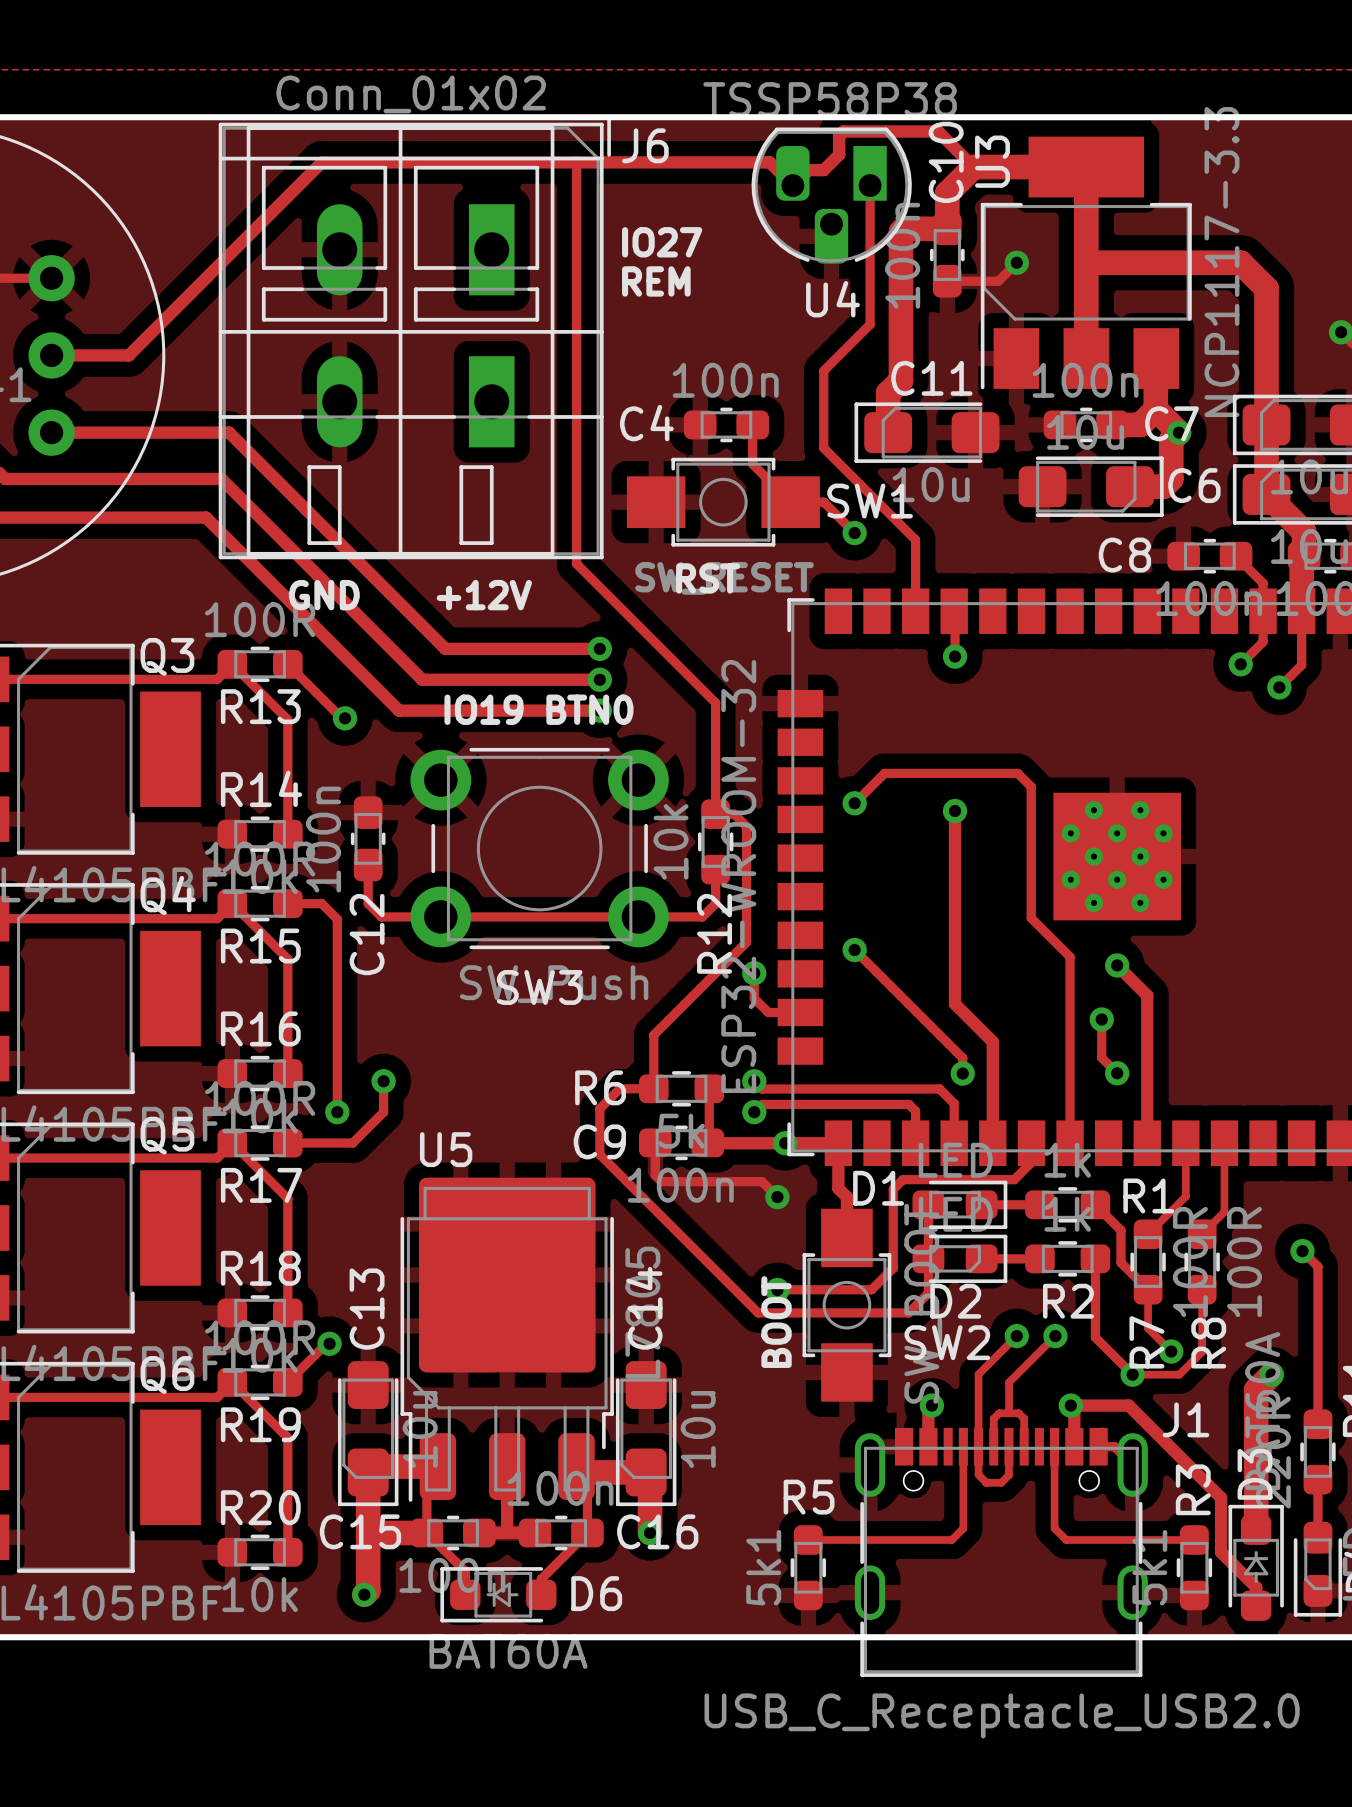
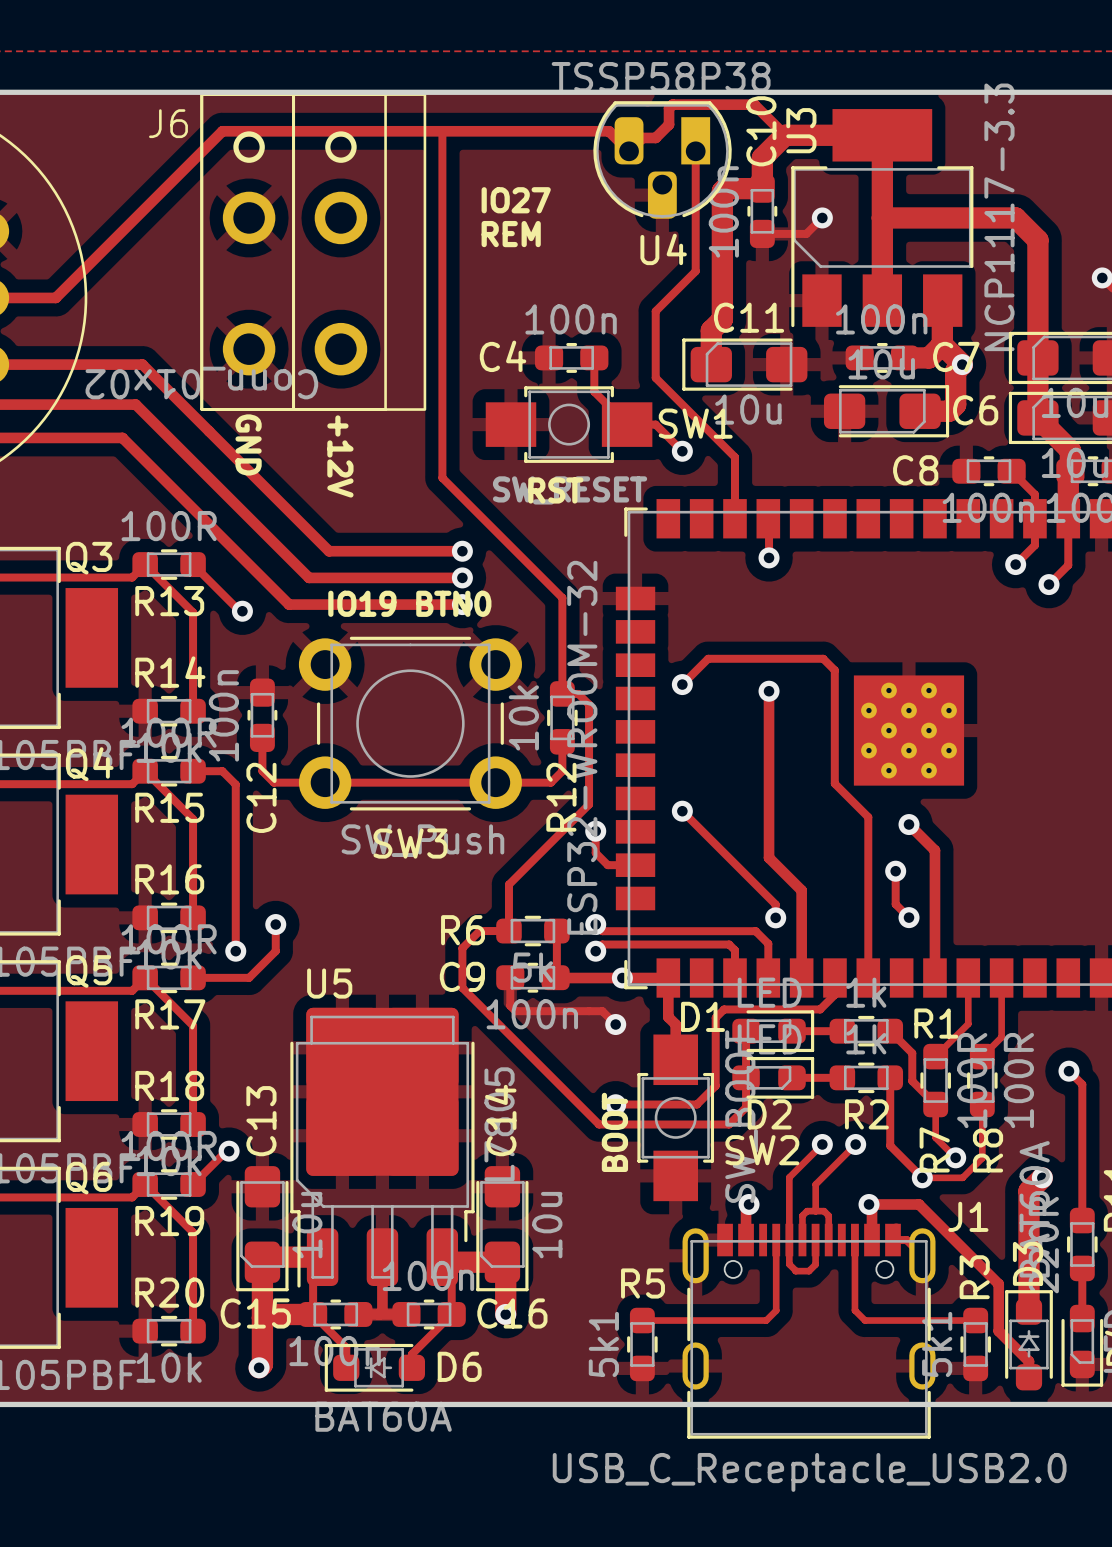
J6 value position: Conn_01x02 (411, 94) -> Conn_01x02 (201, 383)
J6 footprint: [218, 115, 611, 560] -> [200, 93, 427, 411]
J6 name position: J6 (645, 145) -> J6 (168, 123)
text rotation: 0° (324, 595) -> 90° clockwise (248, 444)
text rotation: 0° (484, 595) -> 90° clockwise (340, 456)

